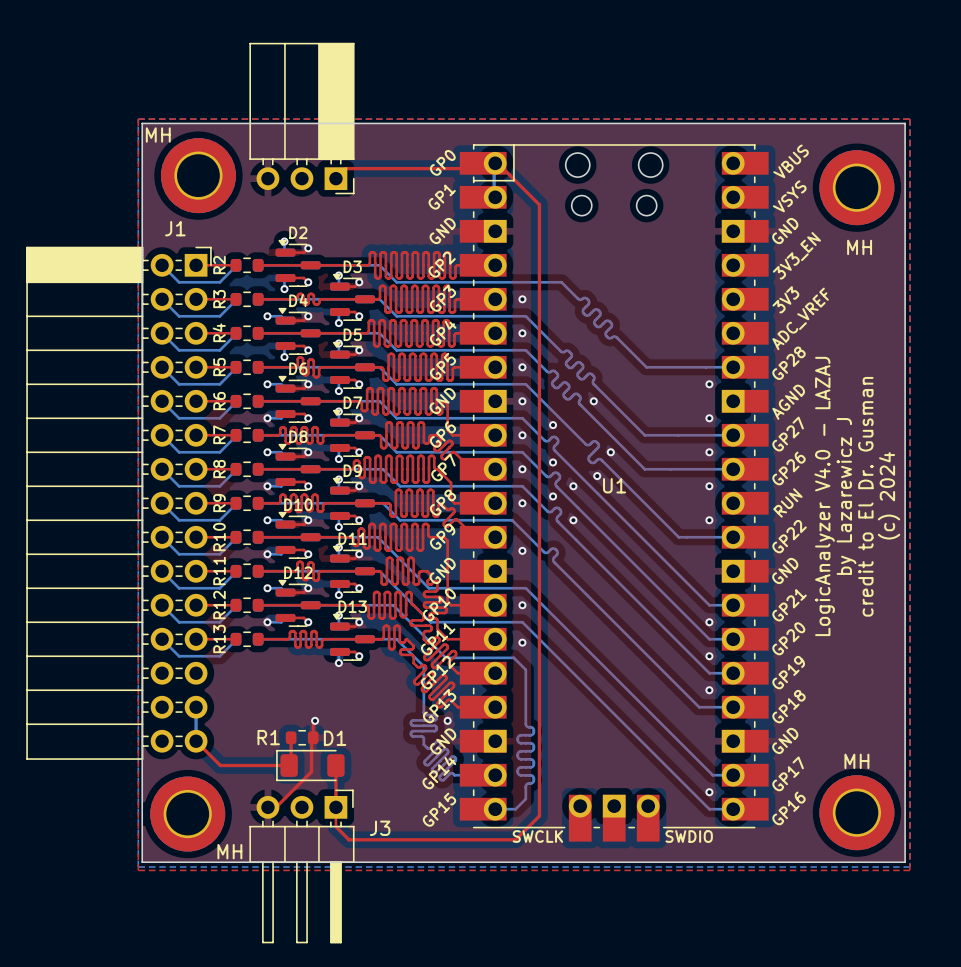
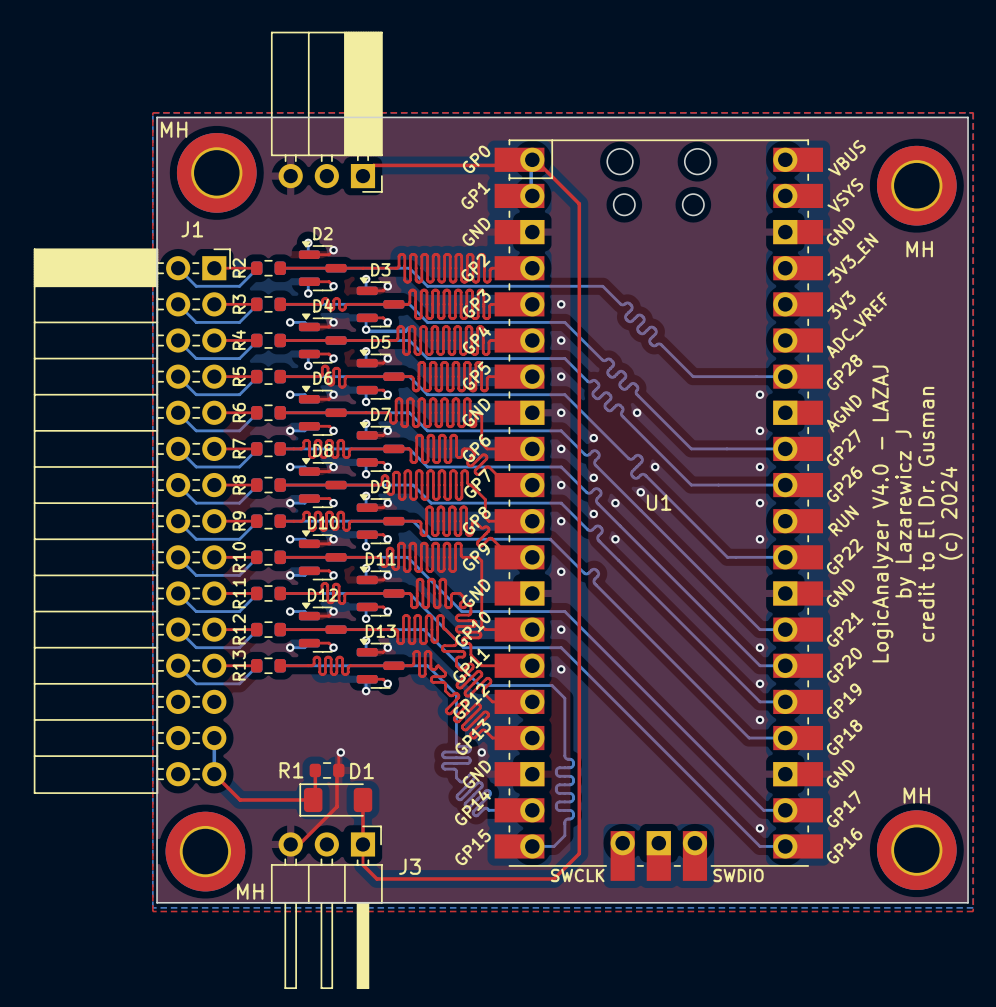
bottom track: none -> (408, 327) (405, 331) (367, 331) (366, 329)

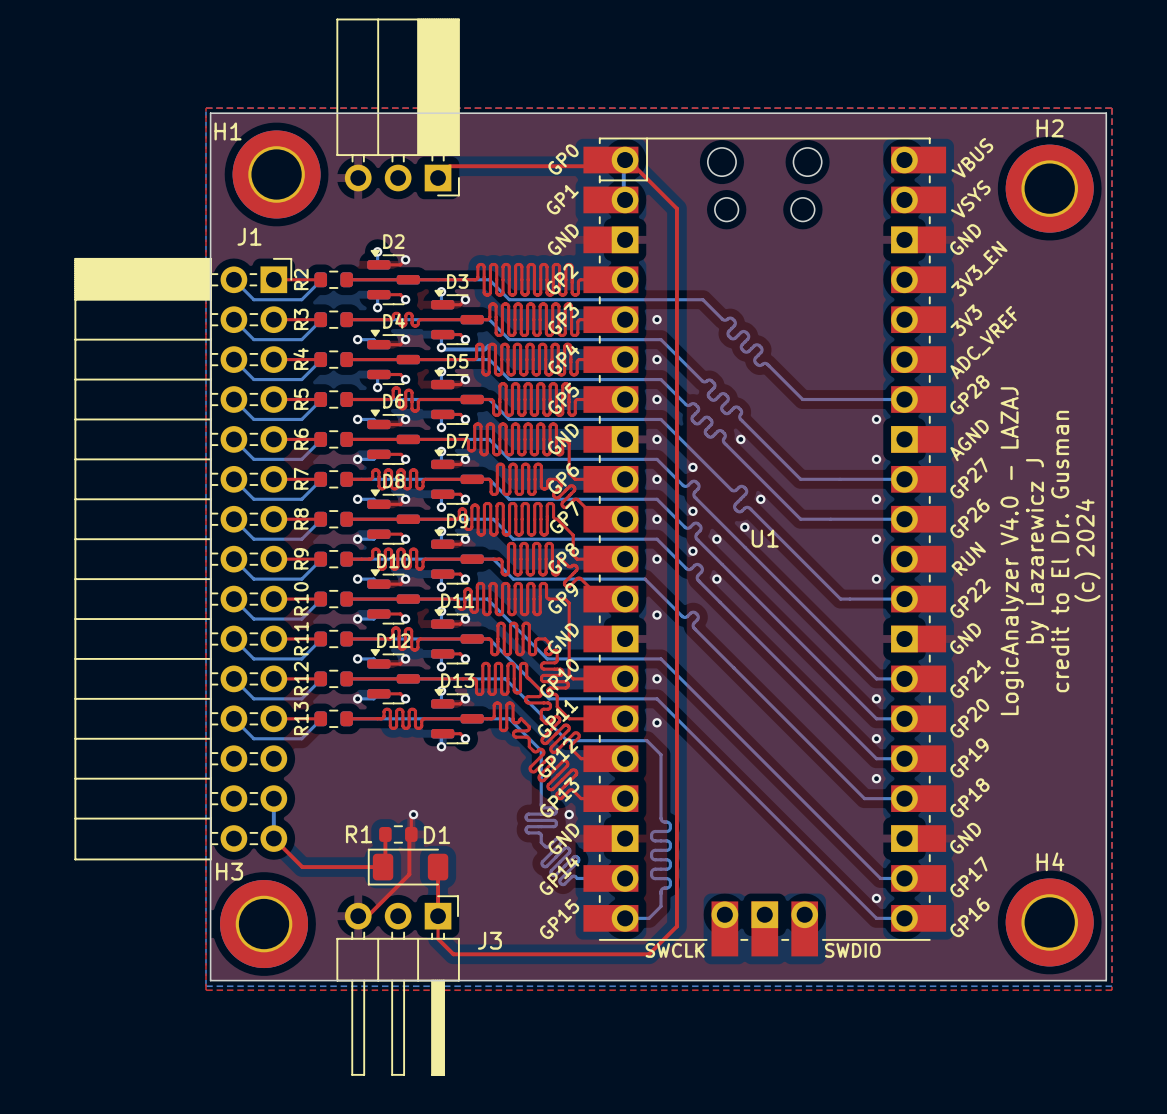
MH name: MH (174, 129) -> H1 (228, 131)
MH name: MH (919, 249) -> H2 (1050, 128)
MH name: MH (916, 795) -> H4 (1050, 861)
MH name: MH (250, 891) -> H3 (229, 871)

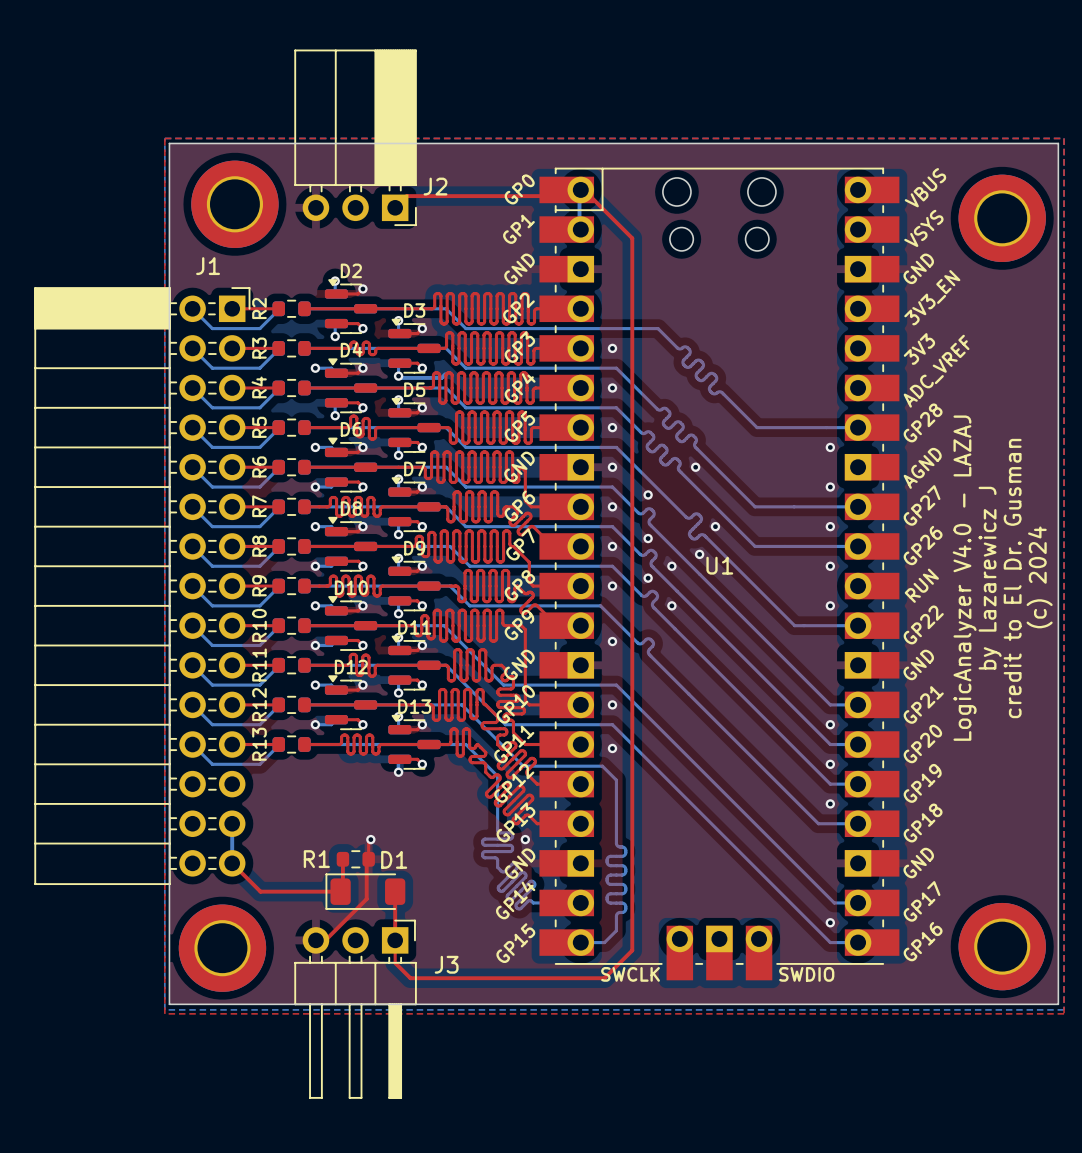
H2 name: H2 (1050, 128) -> none
H1 name: H1 (228, 131) -> none
J2 name: none -> J2 (435, 186)
H4 name: H4 (1050, 861) -> none
H3 name: H3 (229, 871) -> none

